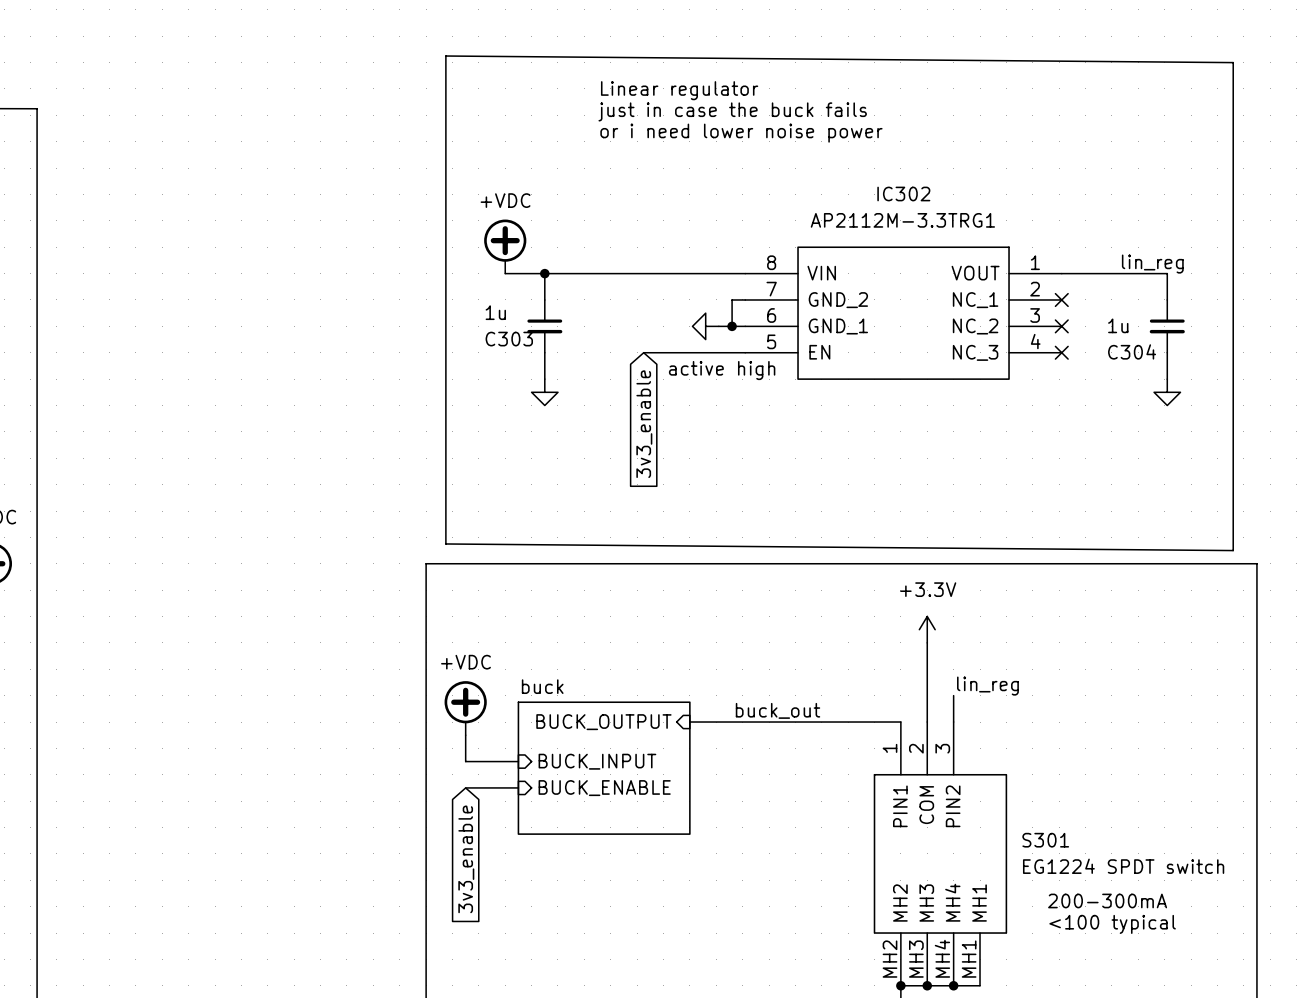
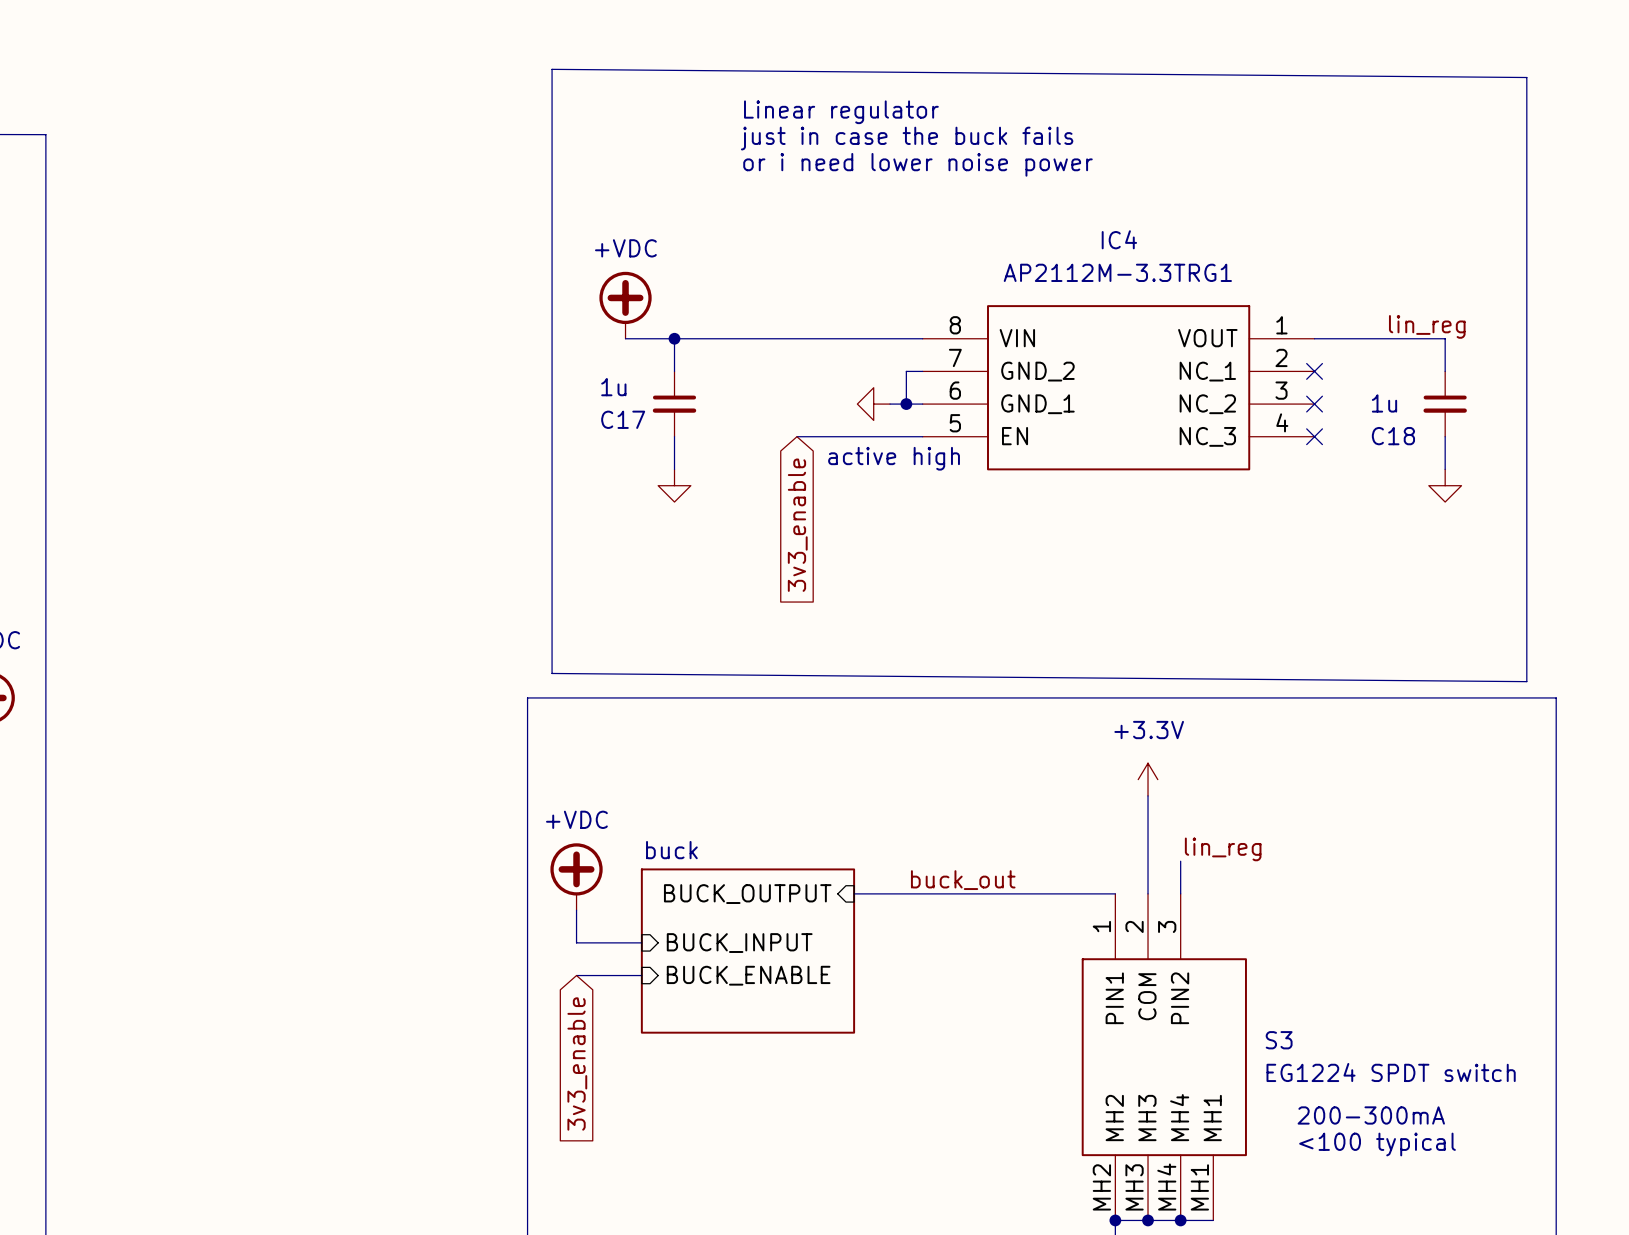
IC302 name: IC302 (903, 193) -> IC4 (1119, 239)
C303 name: C303 (509, 339) -> C17 (623, 419)
C304 name: C304 (1132, 351) -> C18 (1393, 436)
S301 name: S301 (1045, 840) -> S3 (1279, 1040)

